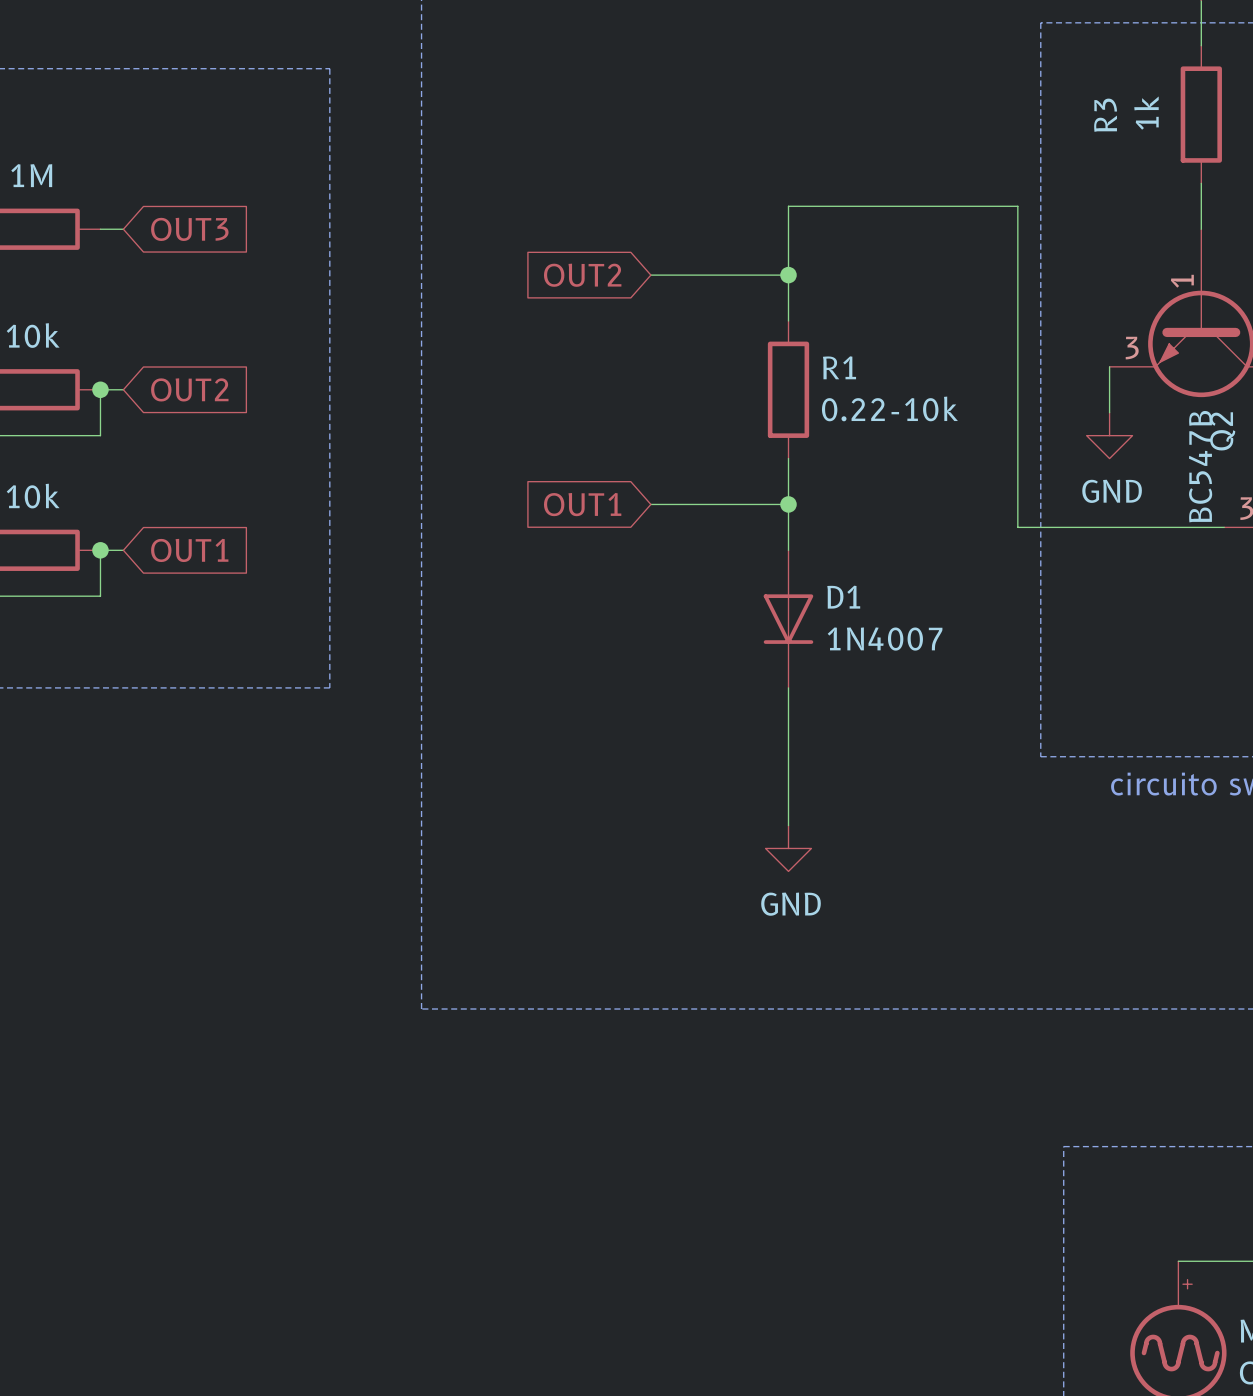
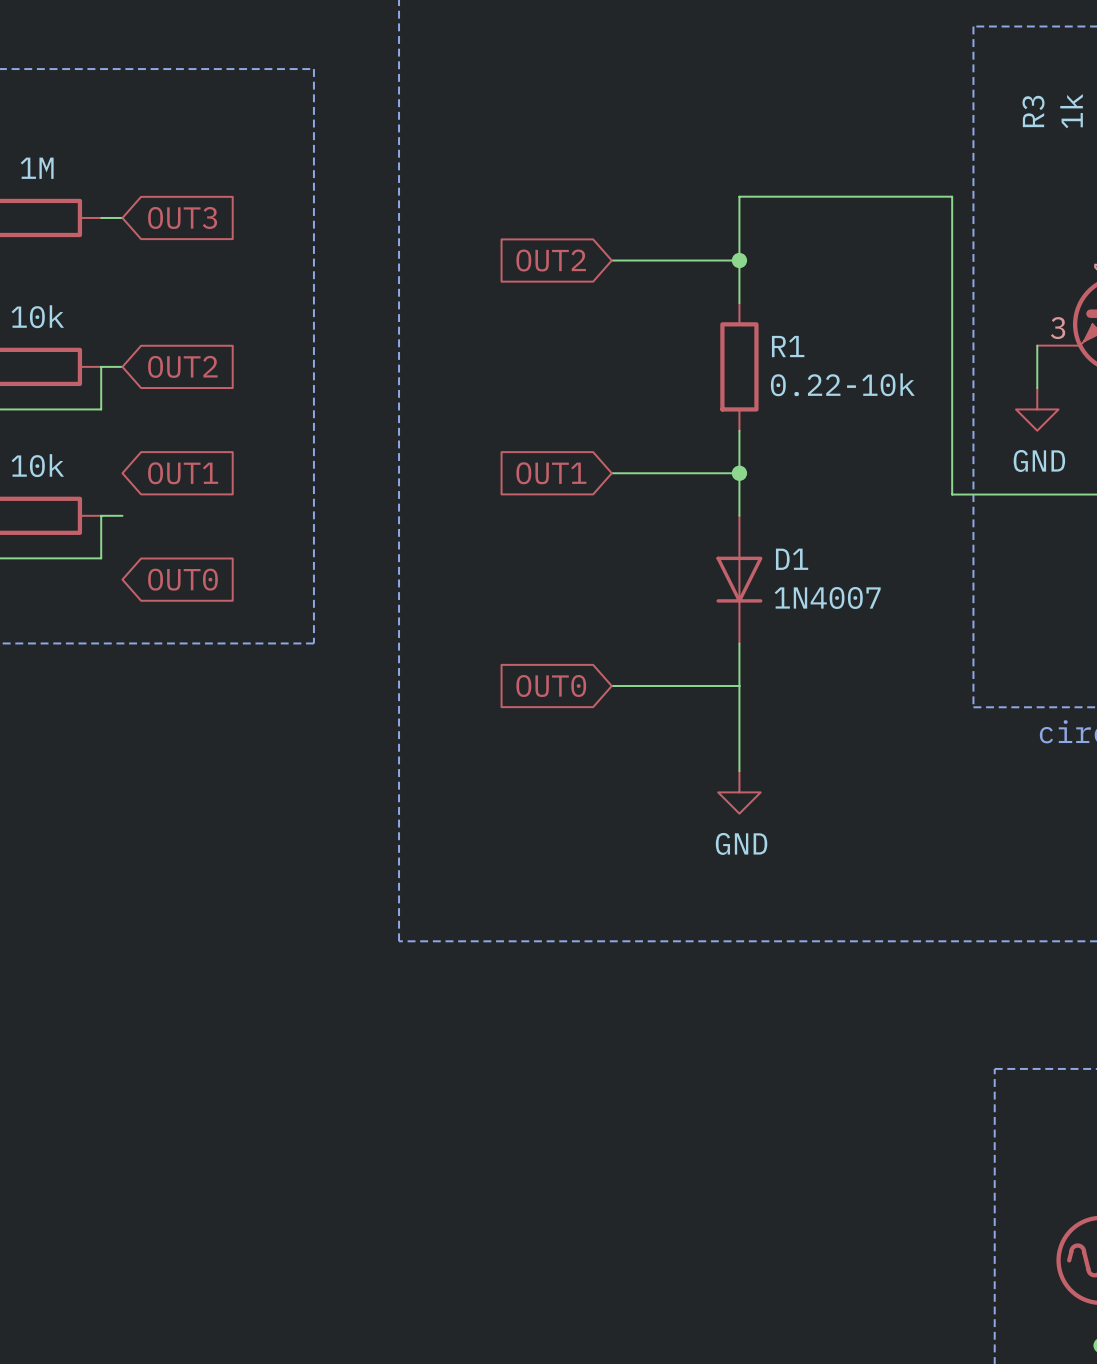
junction: (100, 389) -> none
junction: (100, 550) -> none
global label position: OUT1 (189, 550) -> OUT1 (183, 473)
global label: none -> OUT0 (182, 579)
global label: none -> OUT0 (551, 686)
wire: none -> (611, 686) (739, 686)

